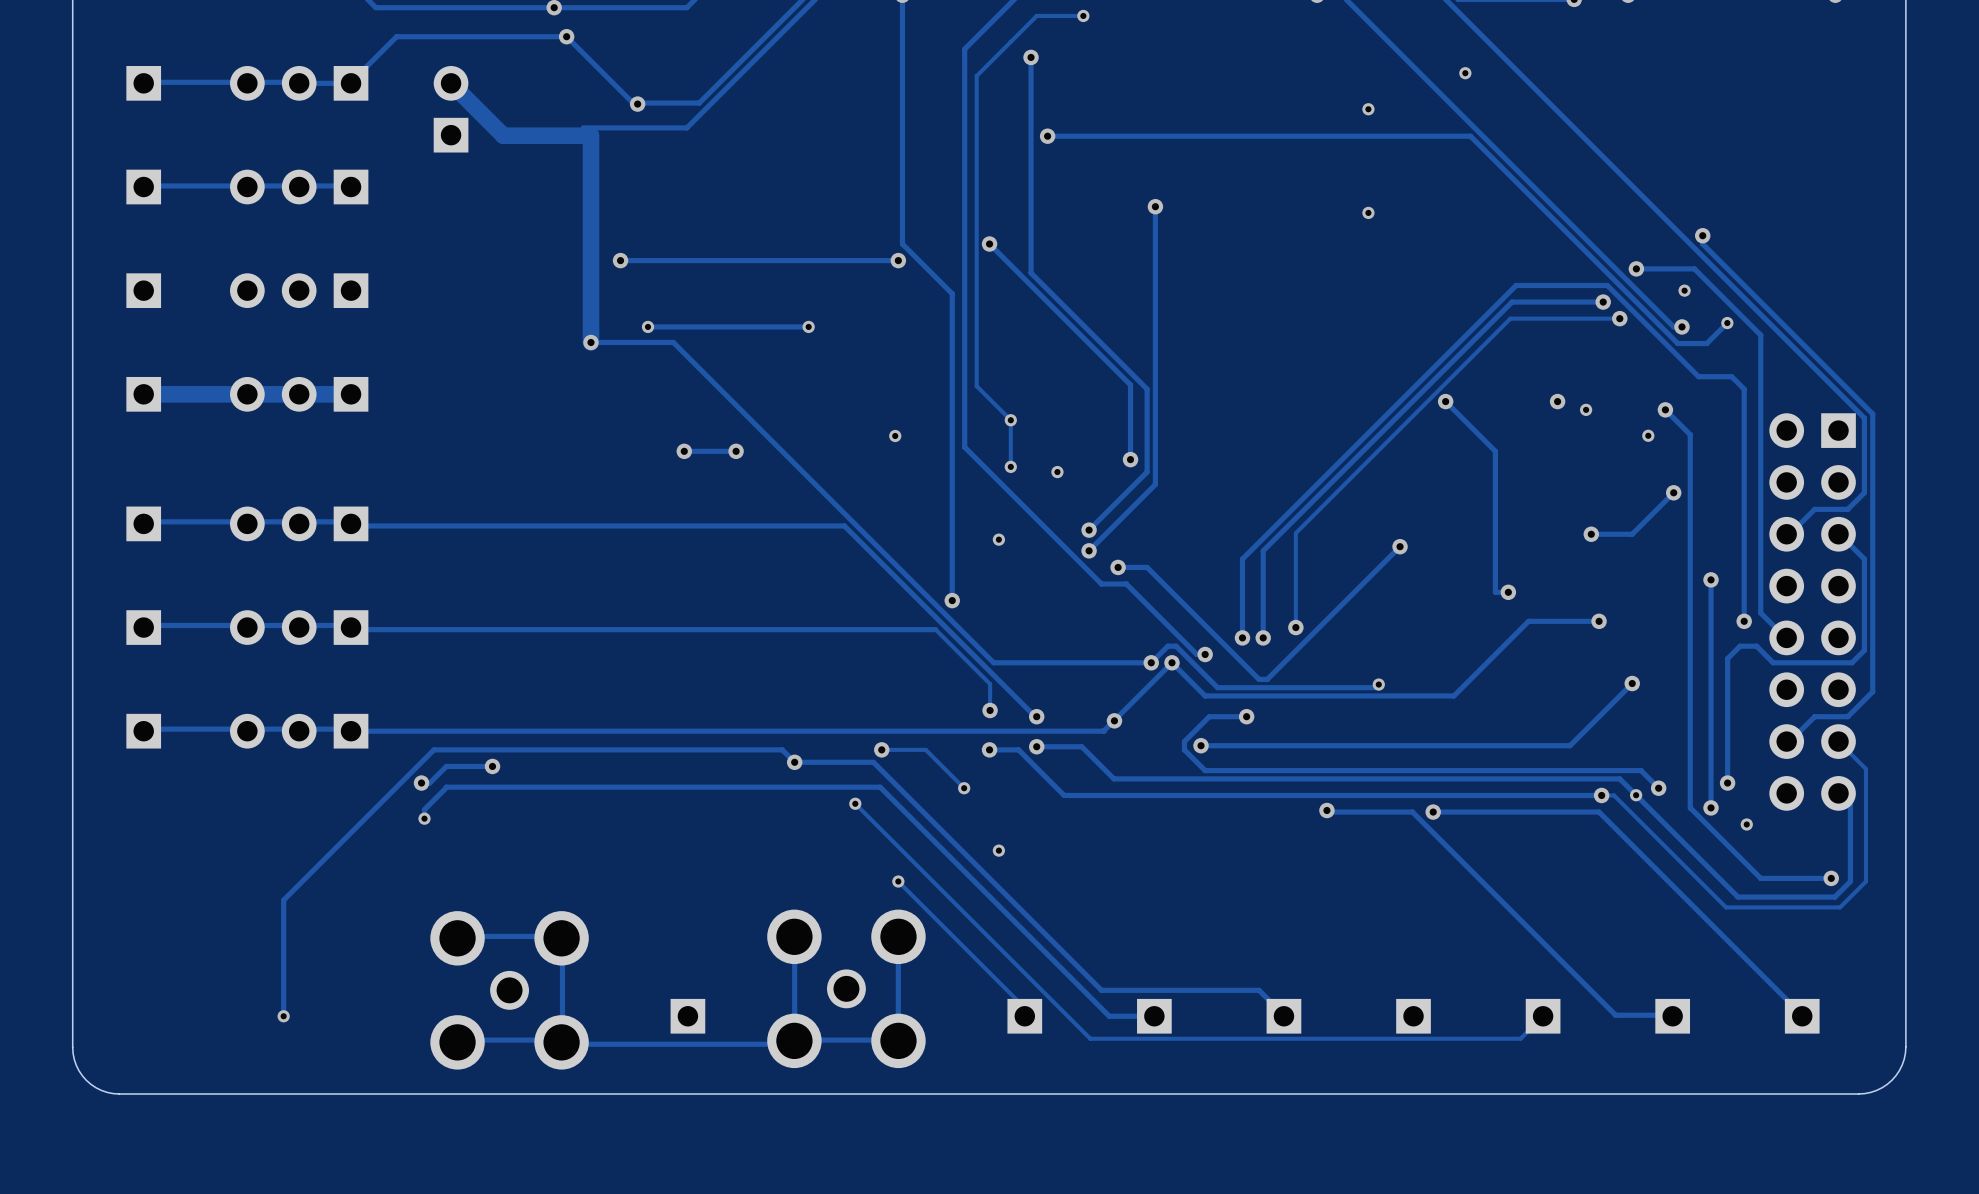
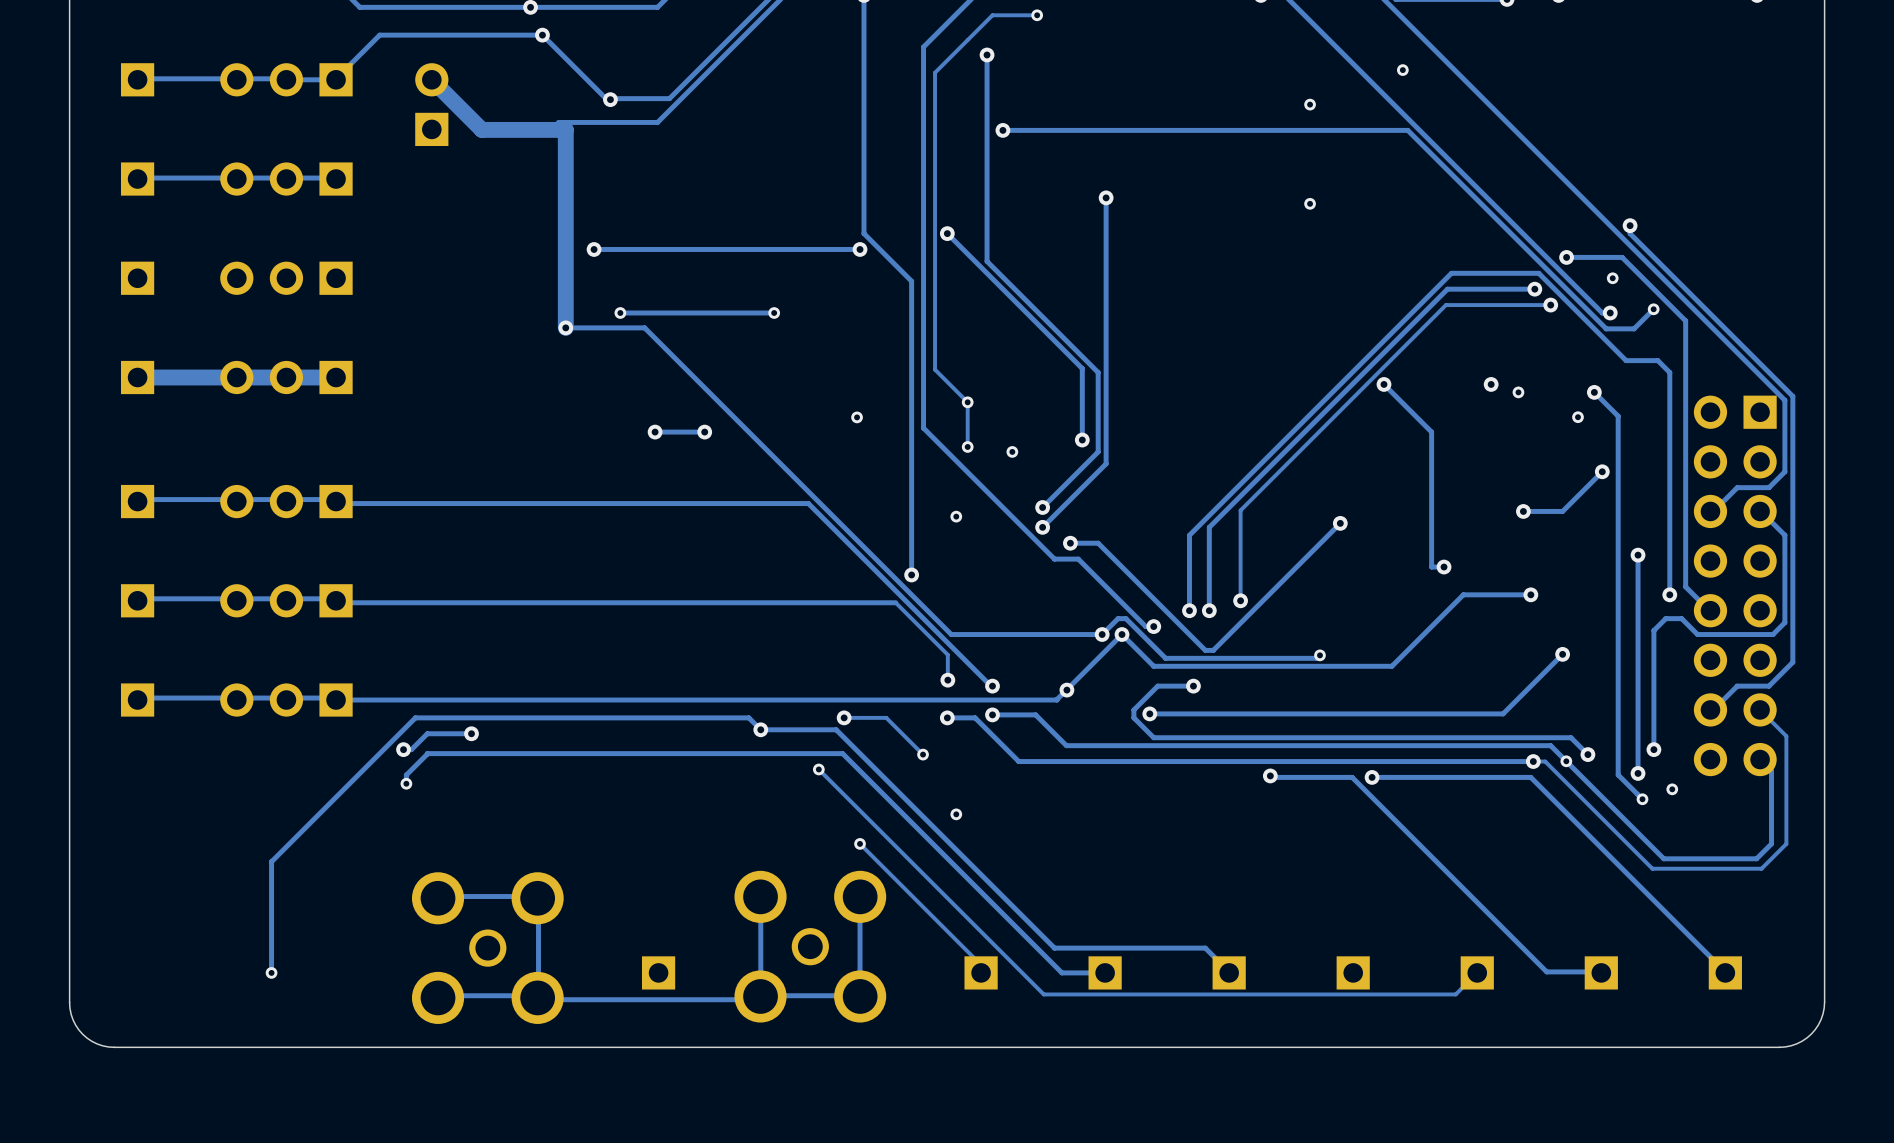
track: (1690, 807) (1760, 878) (1831, 878) -> (1618, 773) (1642, 799)
via: none -> (1642, 799)
via: (1831, 878) -> none

